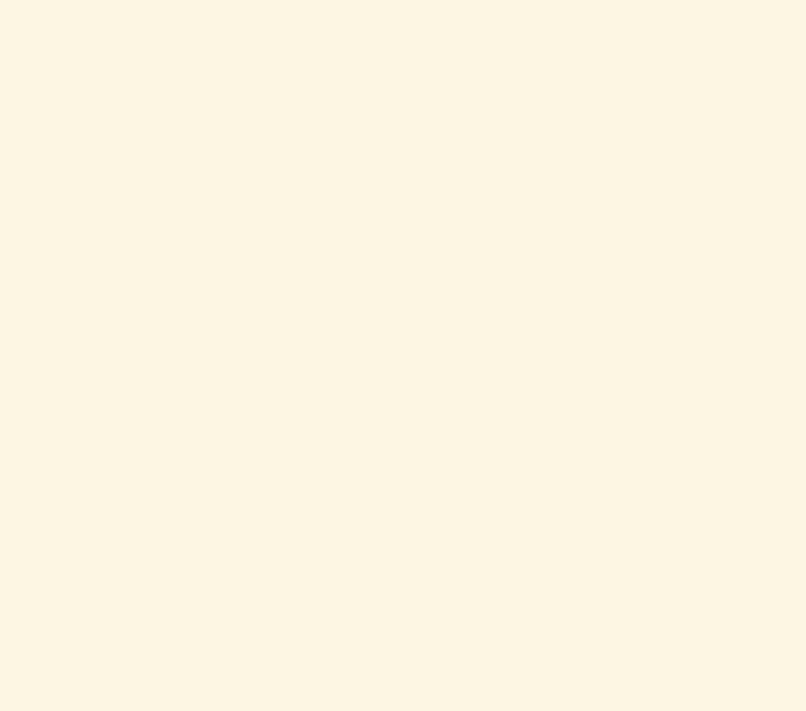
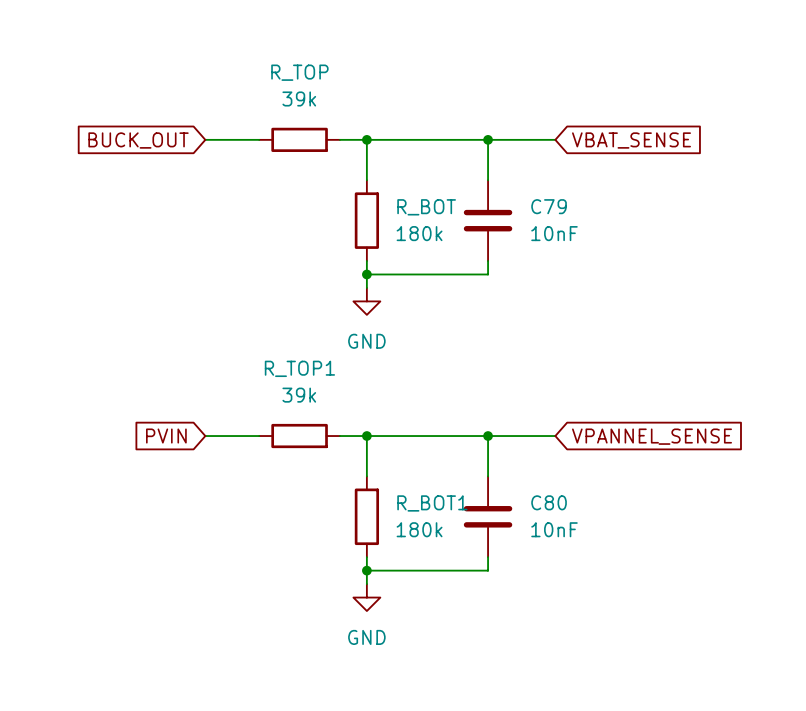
wire: none -> (205, 139) (259, 139)
R_TOP: none -> 39k (299, 139)
wire: none -> (339, 139) (555, 139)
wire: none -> (366, 139) (366, 180)
junction: none -> (366, 139)
wire: none -> (488, 139) (488, 180)
junction: none -> (488, 139)
global label: none -> BUCK_OUT (138, 140)
global label: none -> VBAT_SENSE (631, 140)
R_BOT: none -> 180k (366, 220)
C79: none -> 10nF (488, 220)
wire: none -> (366, 261) (366, 287)
wire: none -> (488, 261) (488, 274) (366, 274)
junction: none -> (366, 274)
power symbol: none -> GND (366, 301)
global label: none -> PVIN (166, 436)
wire: none -> (205, 436) (259, 436)
R_TOP1: none -> 39k (299, 436)
wire: none -> (339, 436) (555, 436)
wire: none -> (366, 436) (366, 476)
junction: none -> (366, 436)
wire: none -> (488, 436) (488, 476)
junction: none -> (488, 436)
global label: none -> VPANNEL_SENSE (652, 436)
R_BOT1: none -> 180k (366, 516)
C80: none -> 10nF (488, 516)
wire: none -> (366, 557) (366, 584)
wire: none -> (488, 557) (488, 570) (366, 570)
junction: none -> (366, 570)
power symbol: none -> GND (366, 597)

